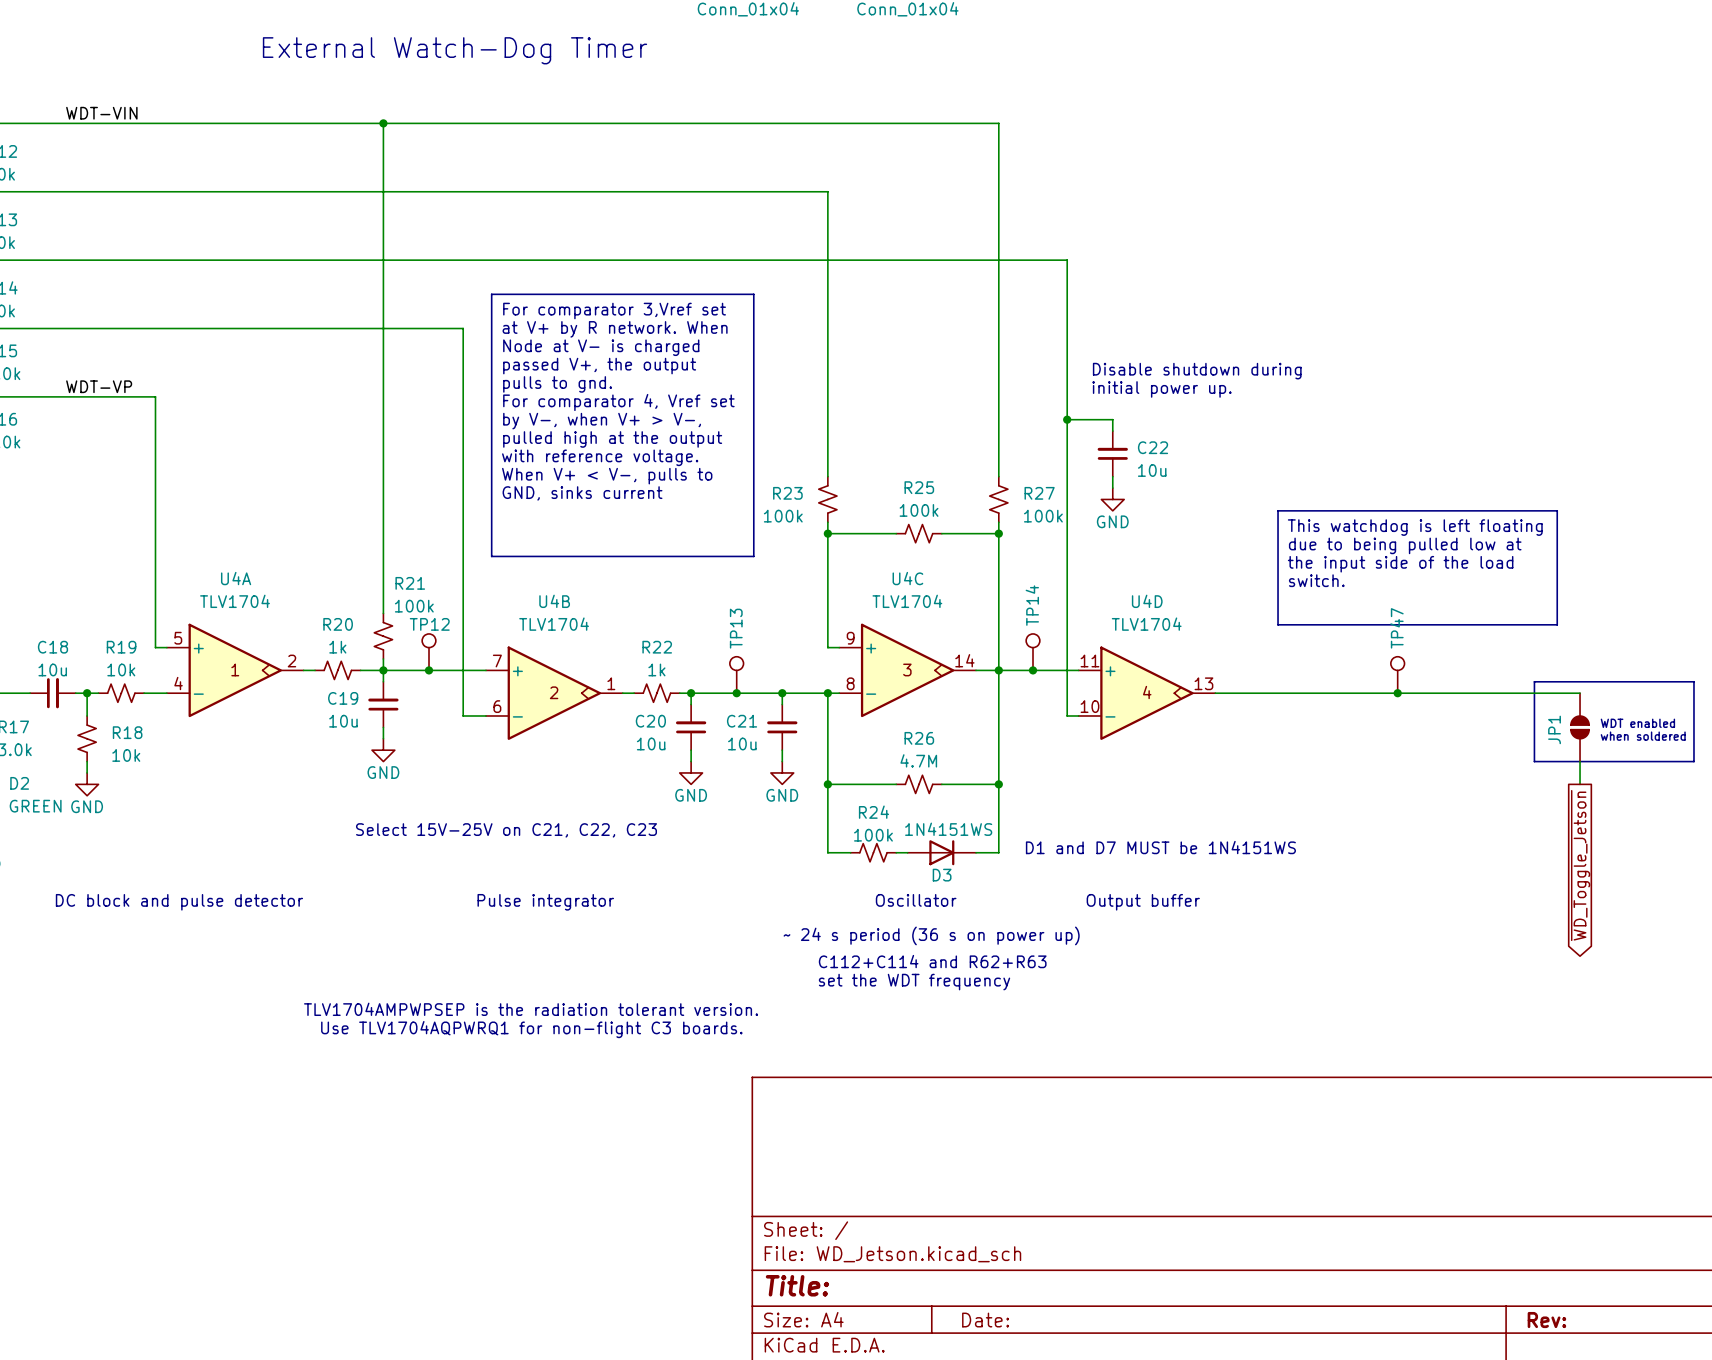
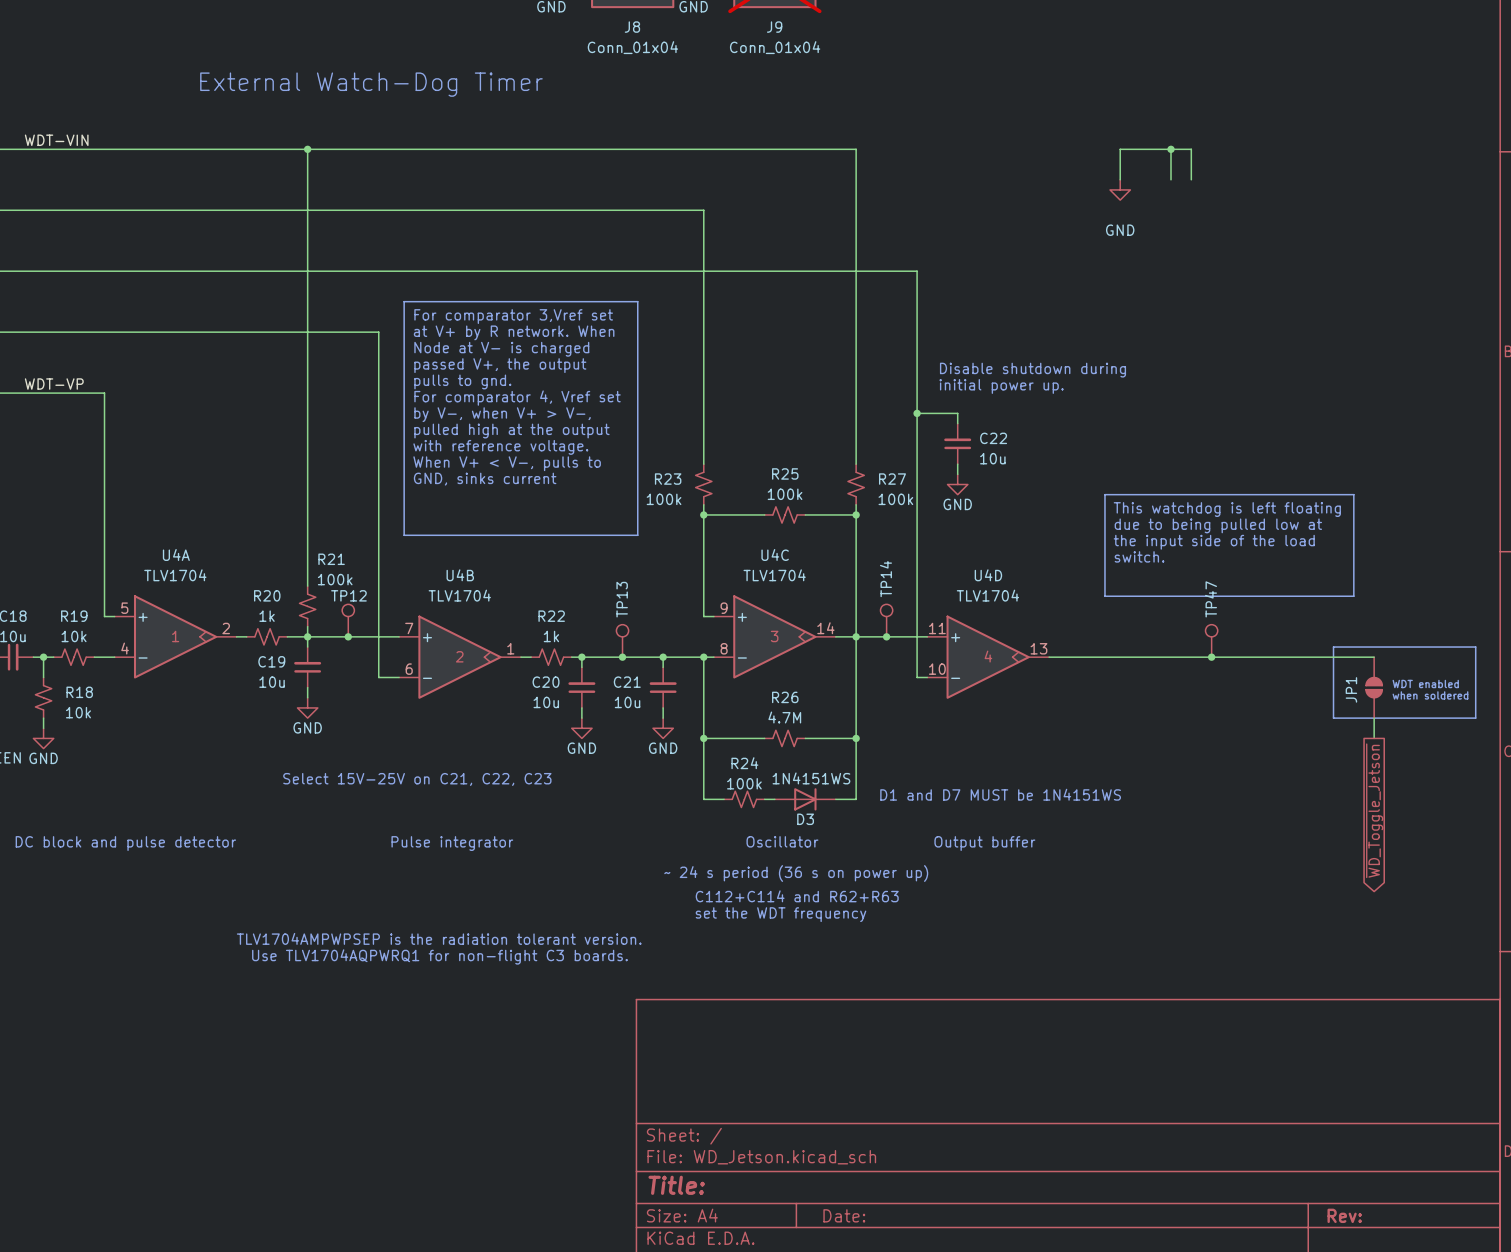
wire: none -> (1171, 149) (1171, 179)
junction: none -> (1171, 149)
wire: none -> (1120, 179) (1120, 149) (1191, 149) (1191, 179)
power symbol: none -> GND (1120, 189)

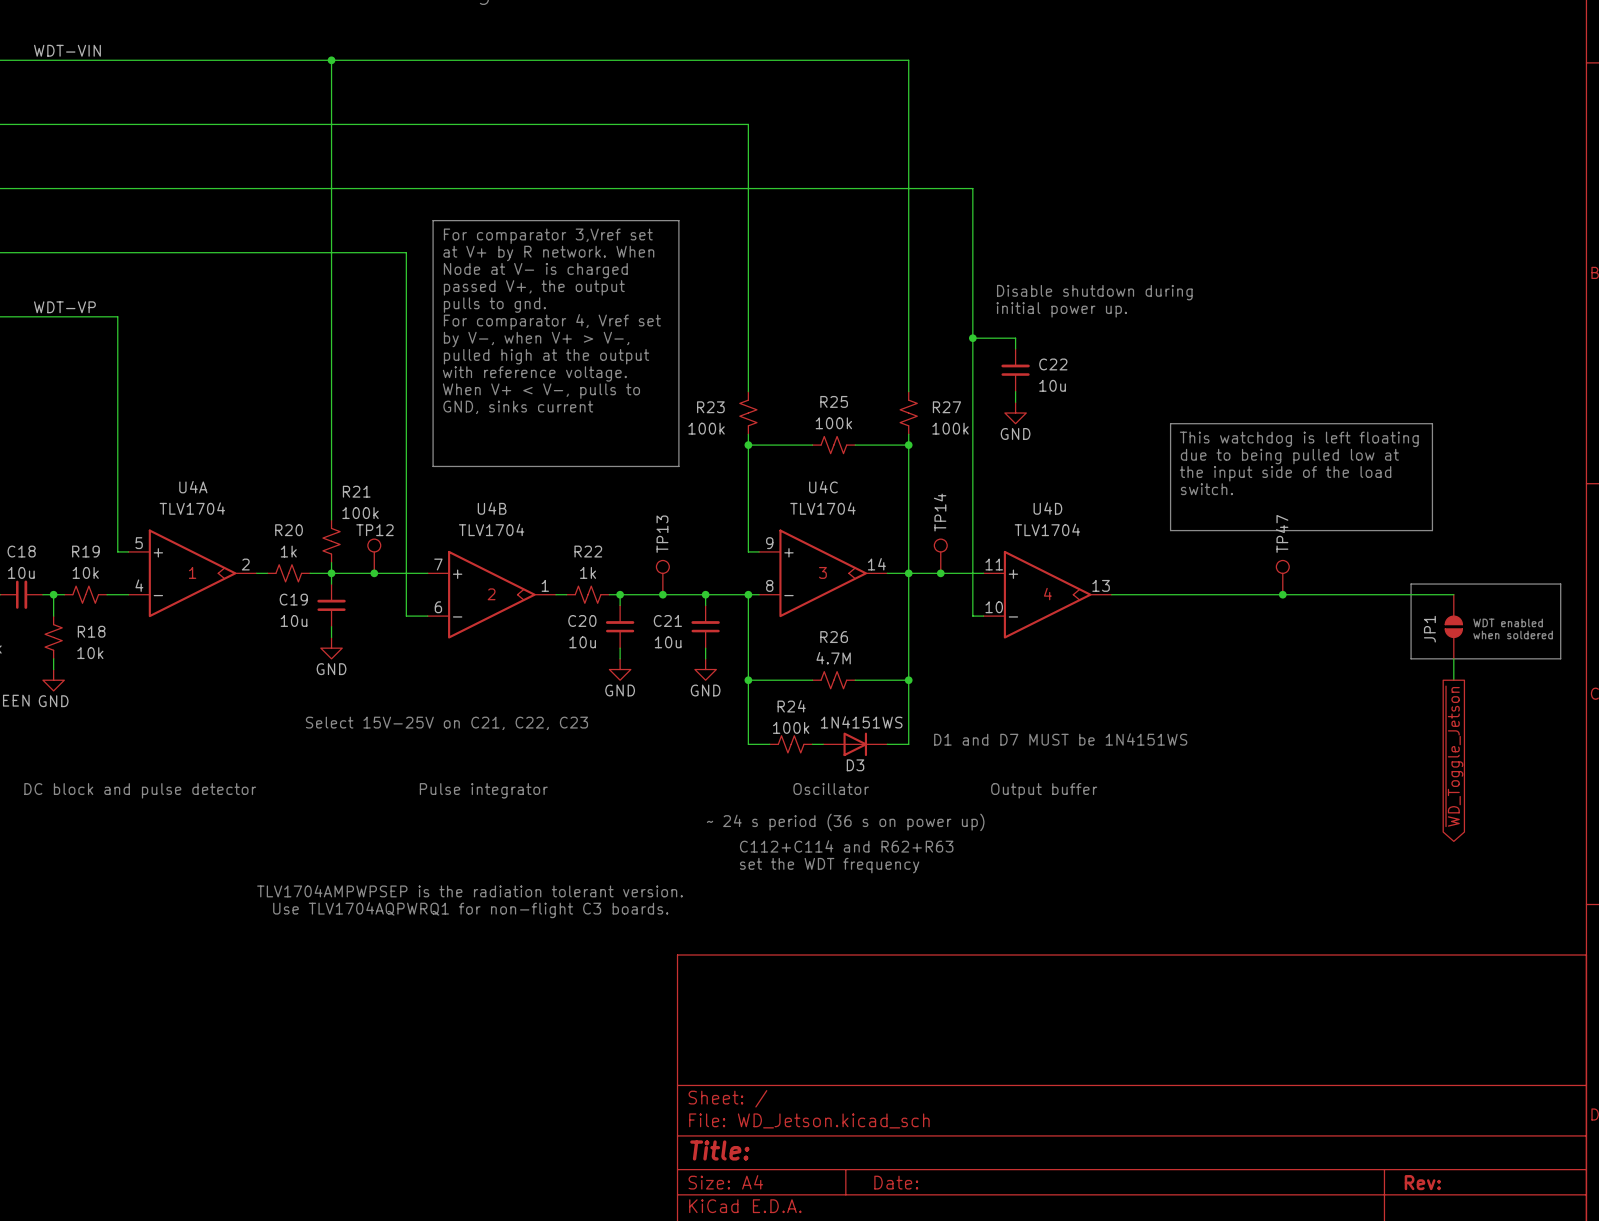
wire: (1171, 149) (1171, 179) -> none
junction: (1171, 149) -> none
wire: (1120, 179) (1120, 149) (1191, 149) (1191, 179) -> none
power symbol: GND (1120, 189) -> none

